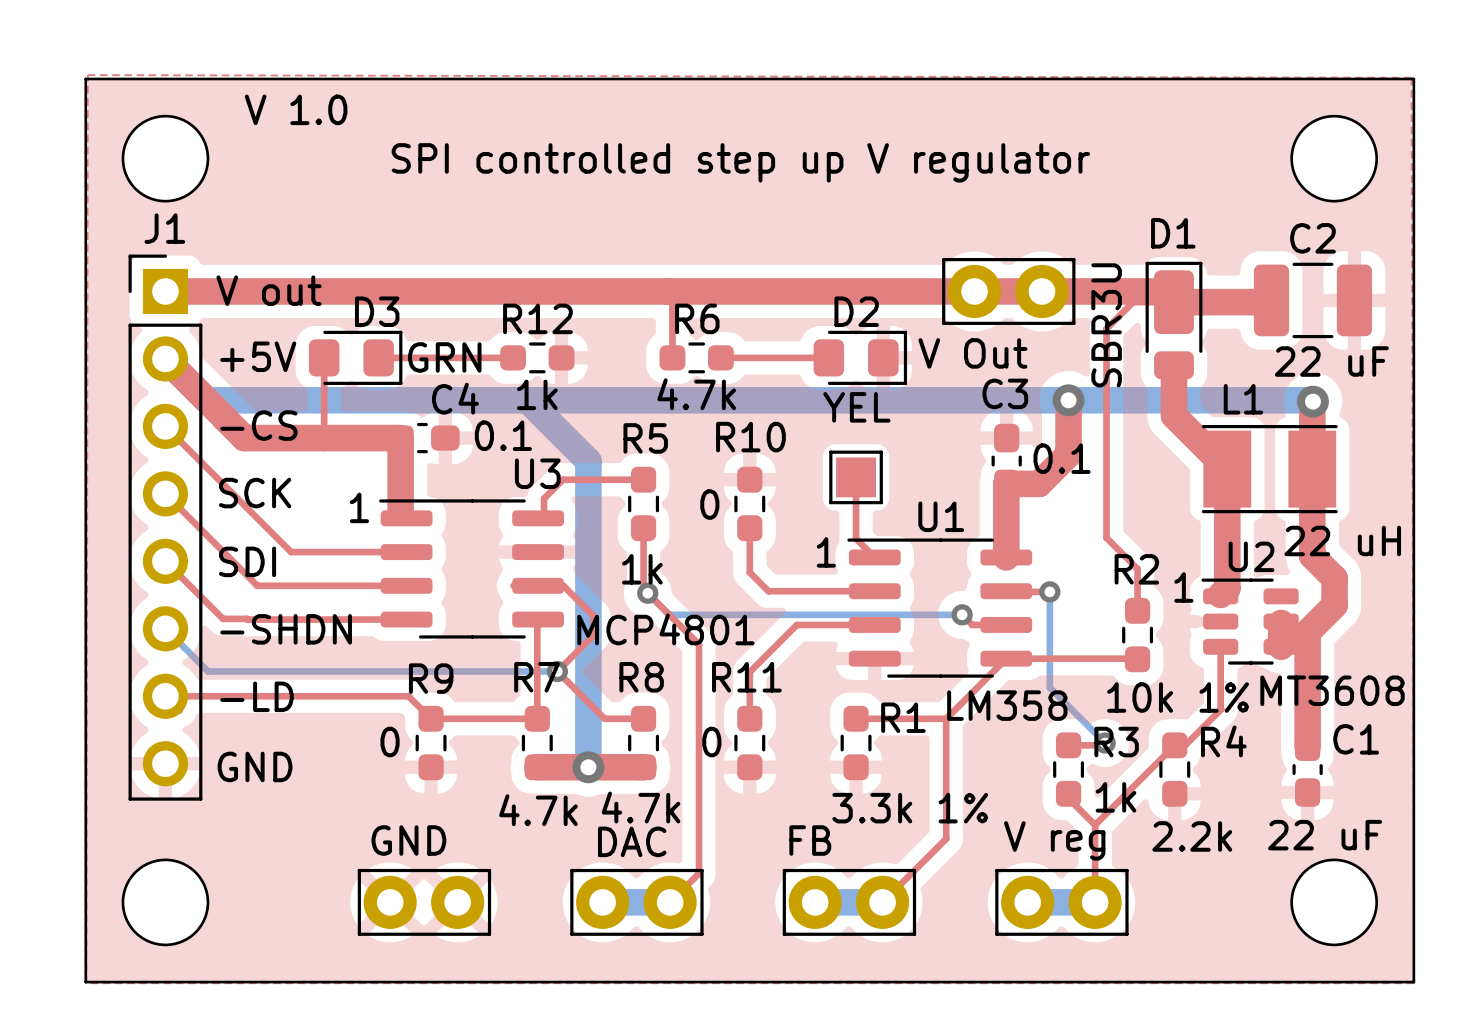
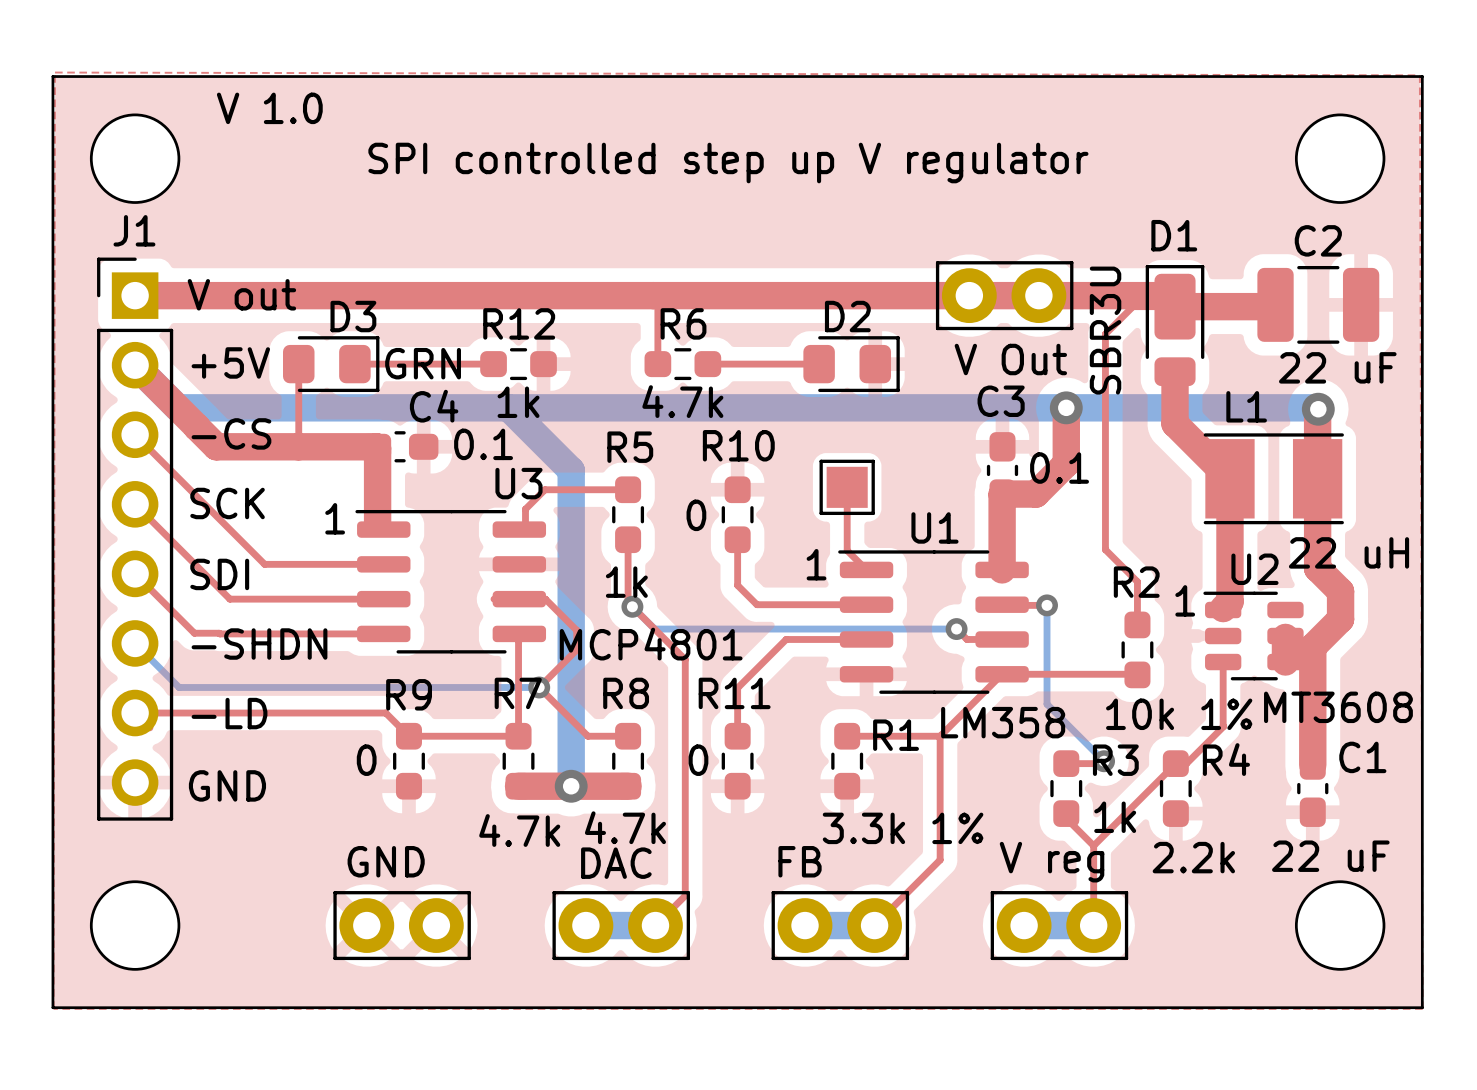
part value position: V Out (972, 353) -> V Out (1010, 359)
D2 value: YEL (856, 407) -> none

